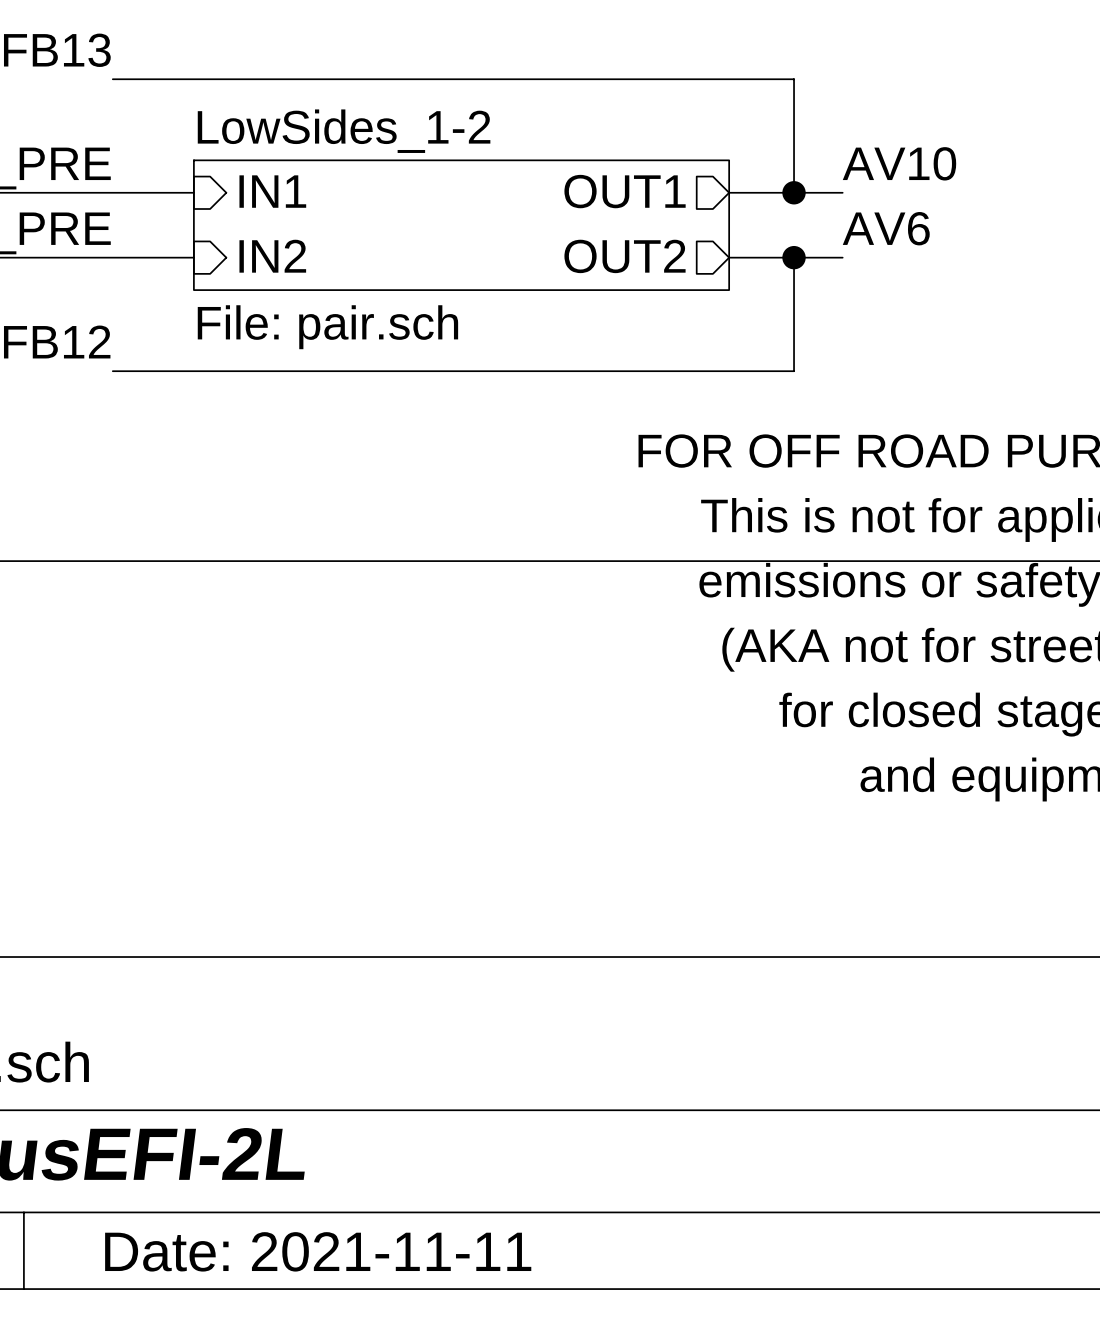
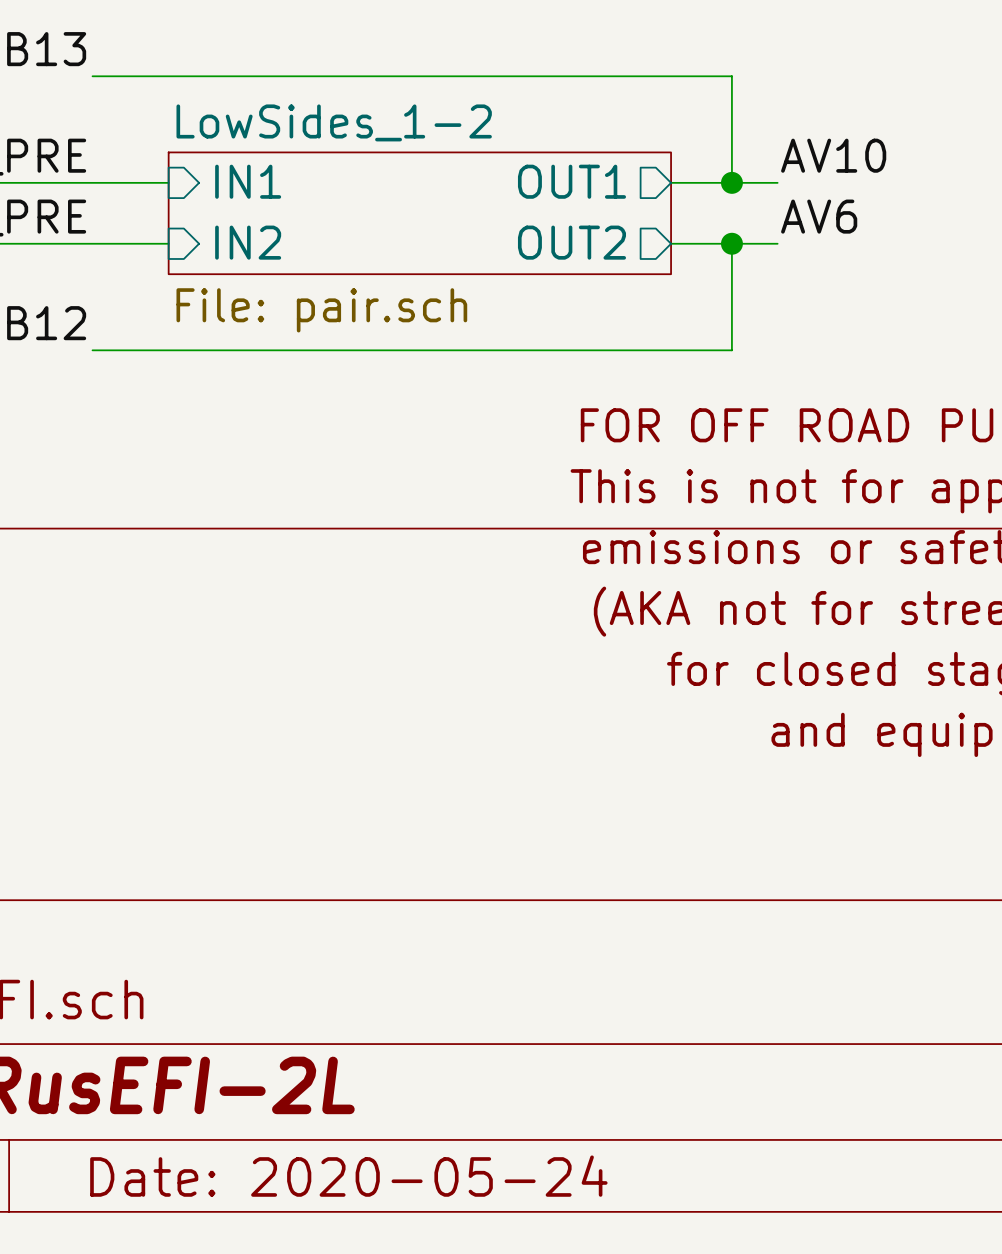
title block: Date: 2021-11-11 (318, 1251) -> Date: 2020-05-24 (348, 1176)

